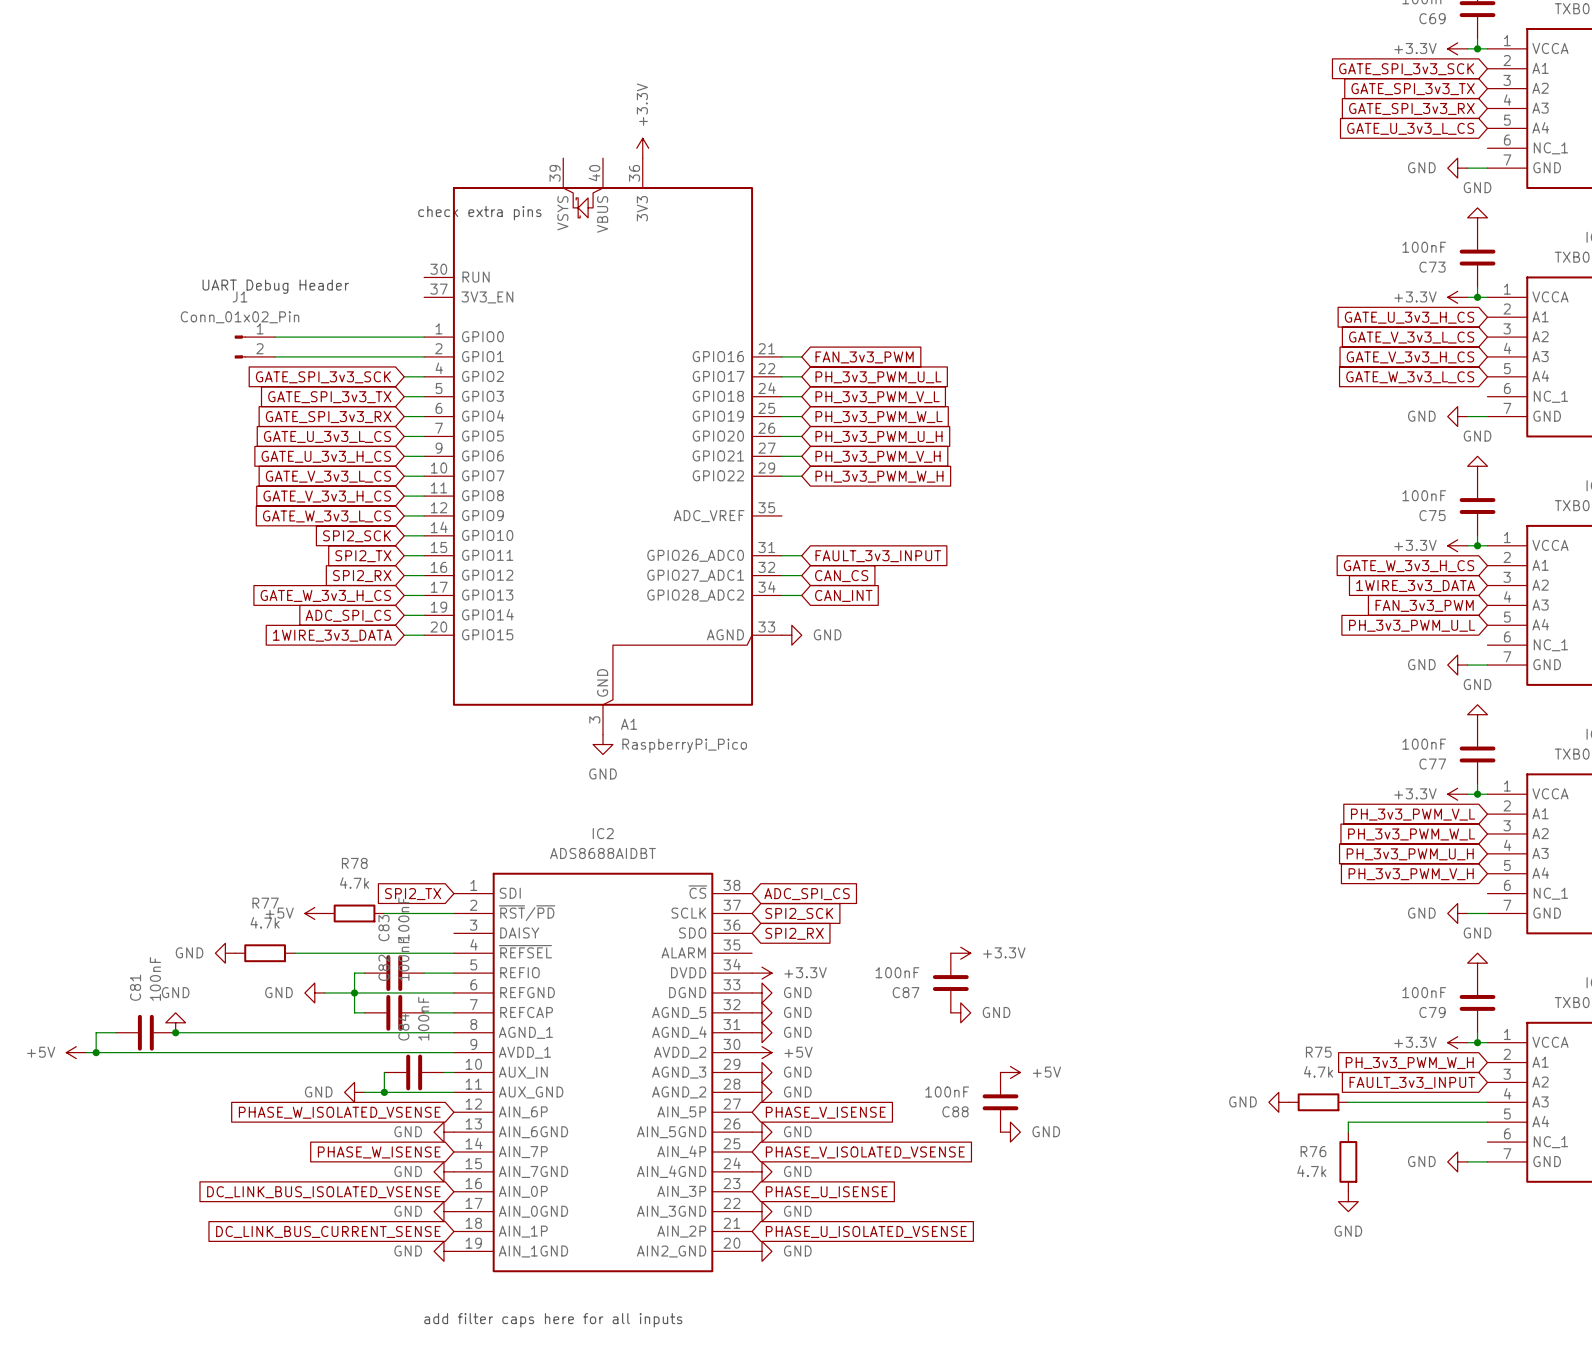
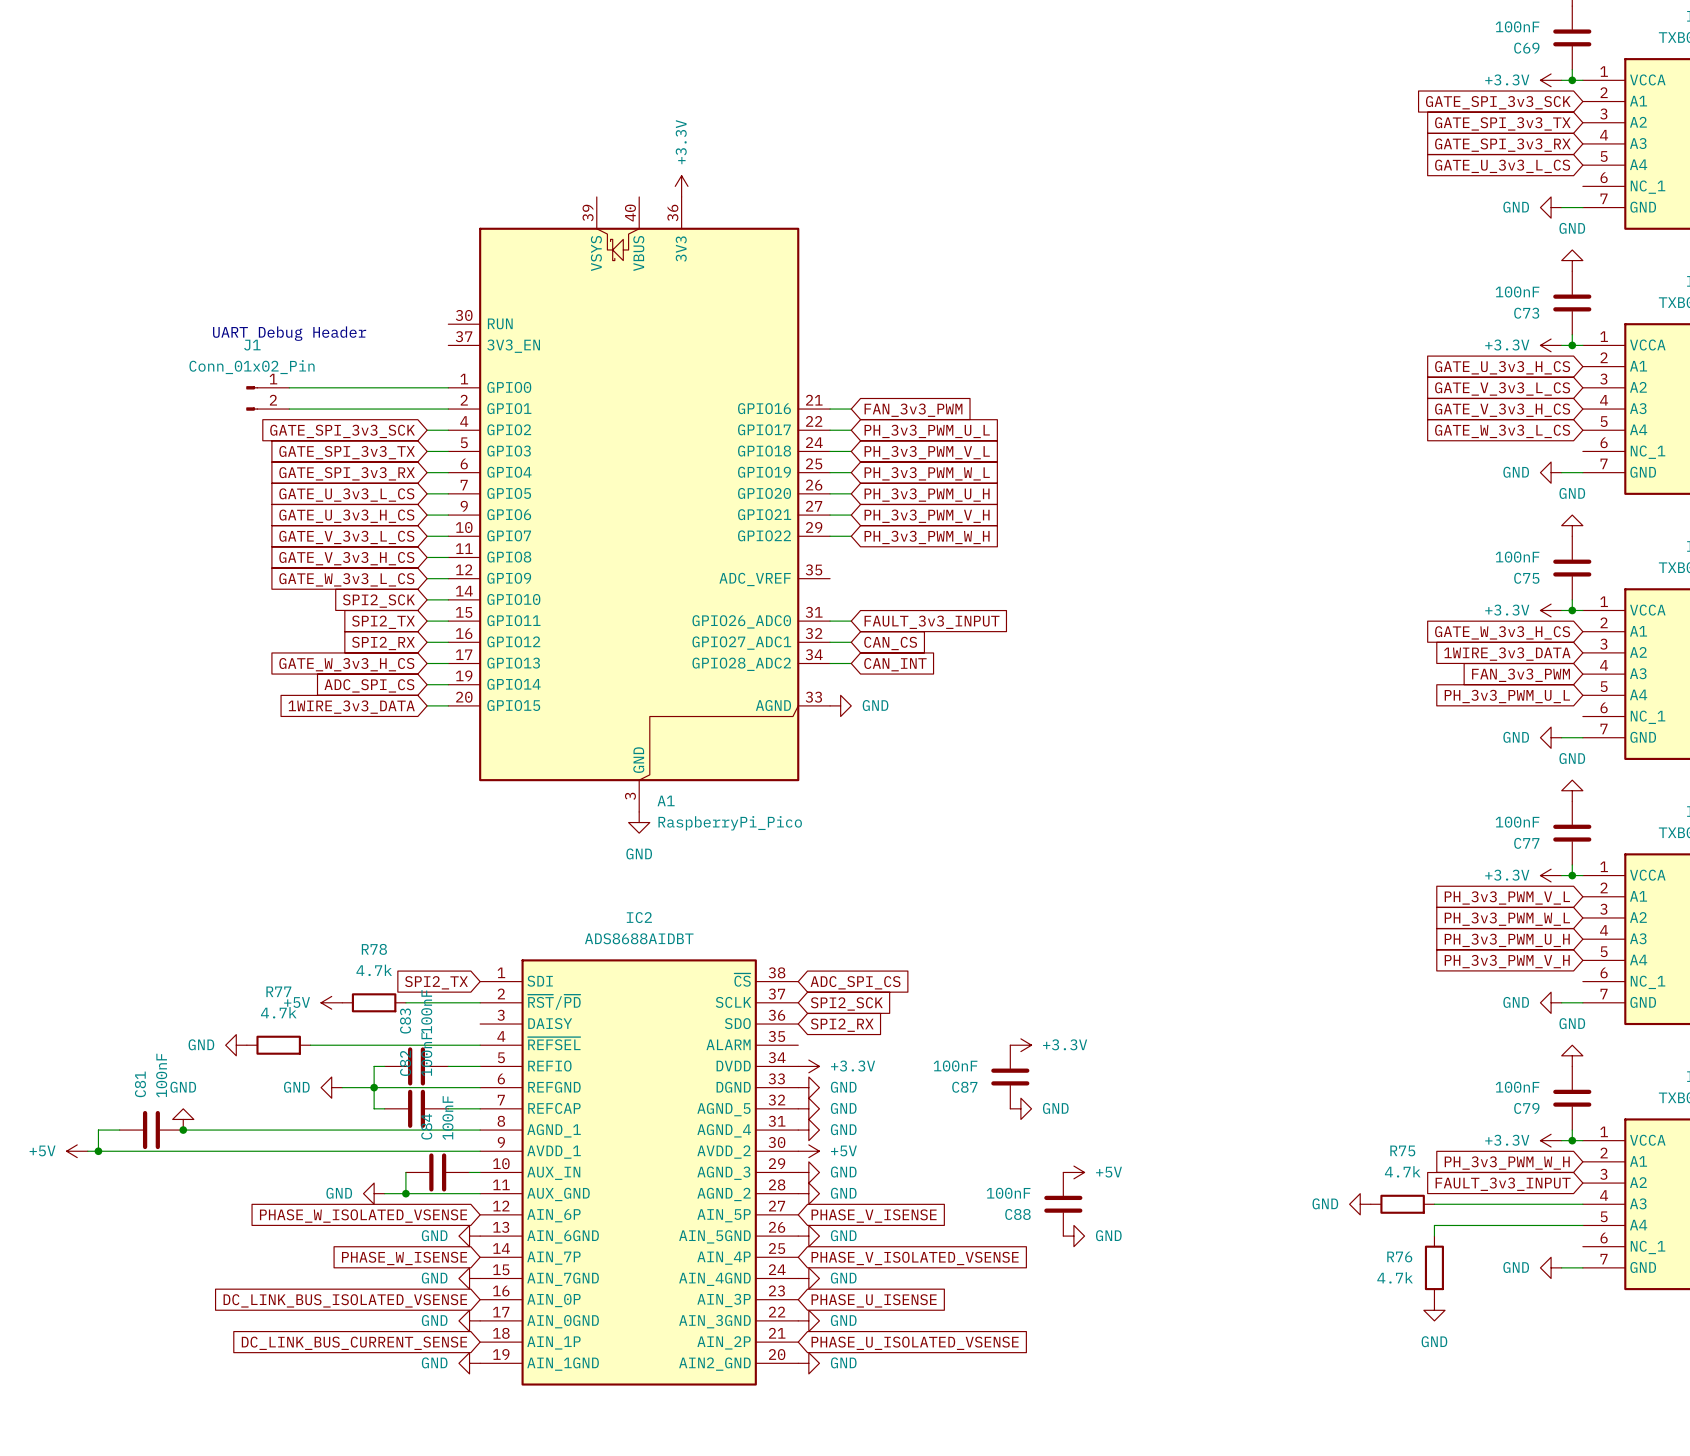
text: check extra pins (479, 213) -> none
text: add filter caps here for all inputs (553, 1320) -> none

